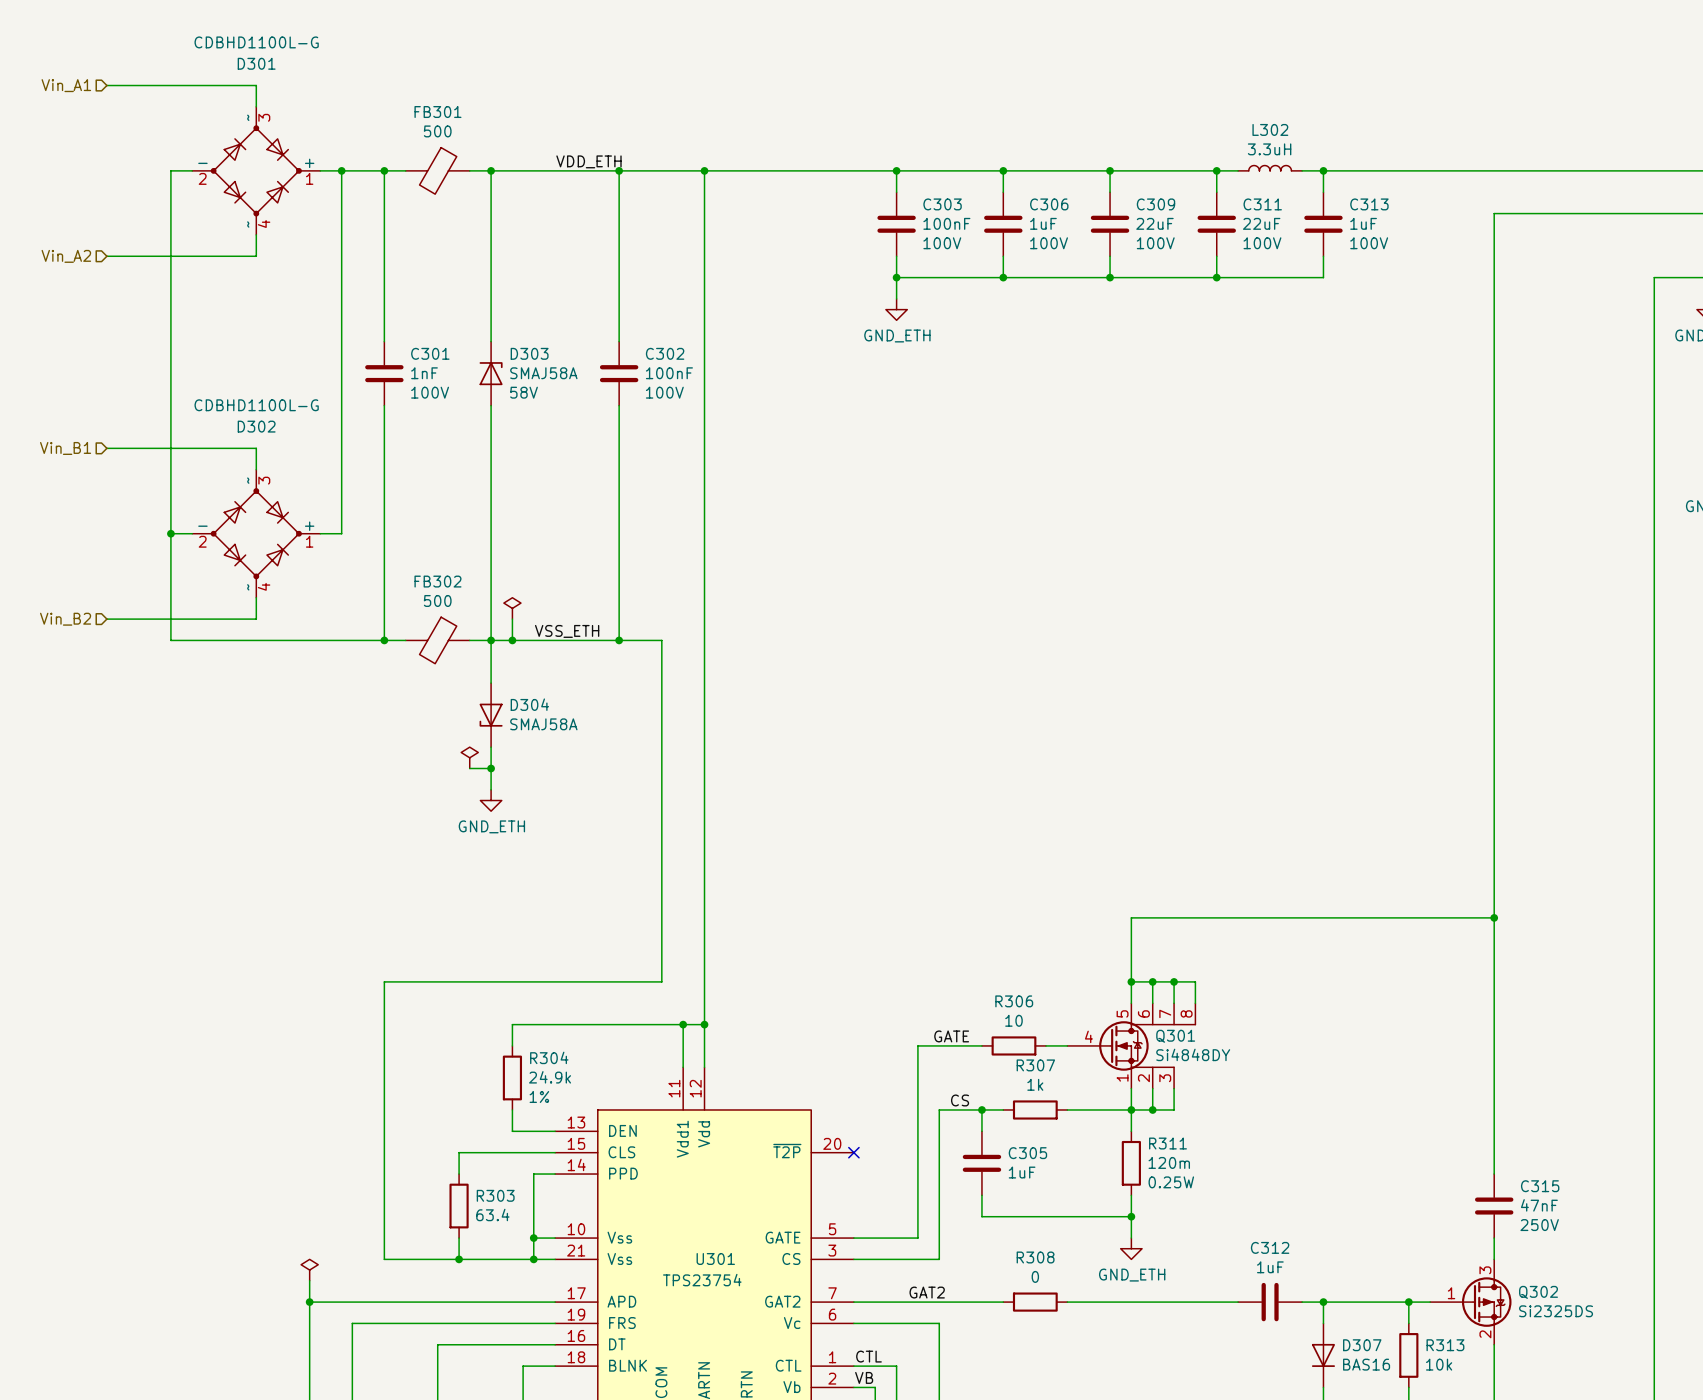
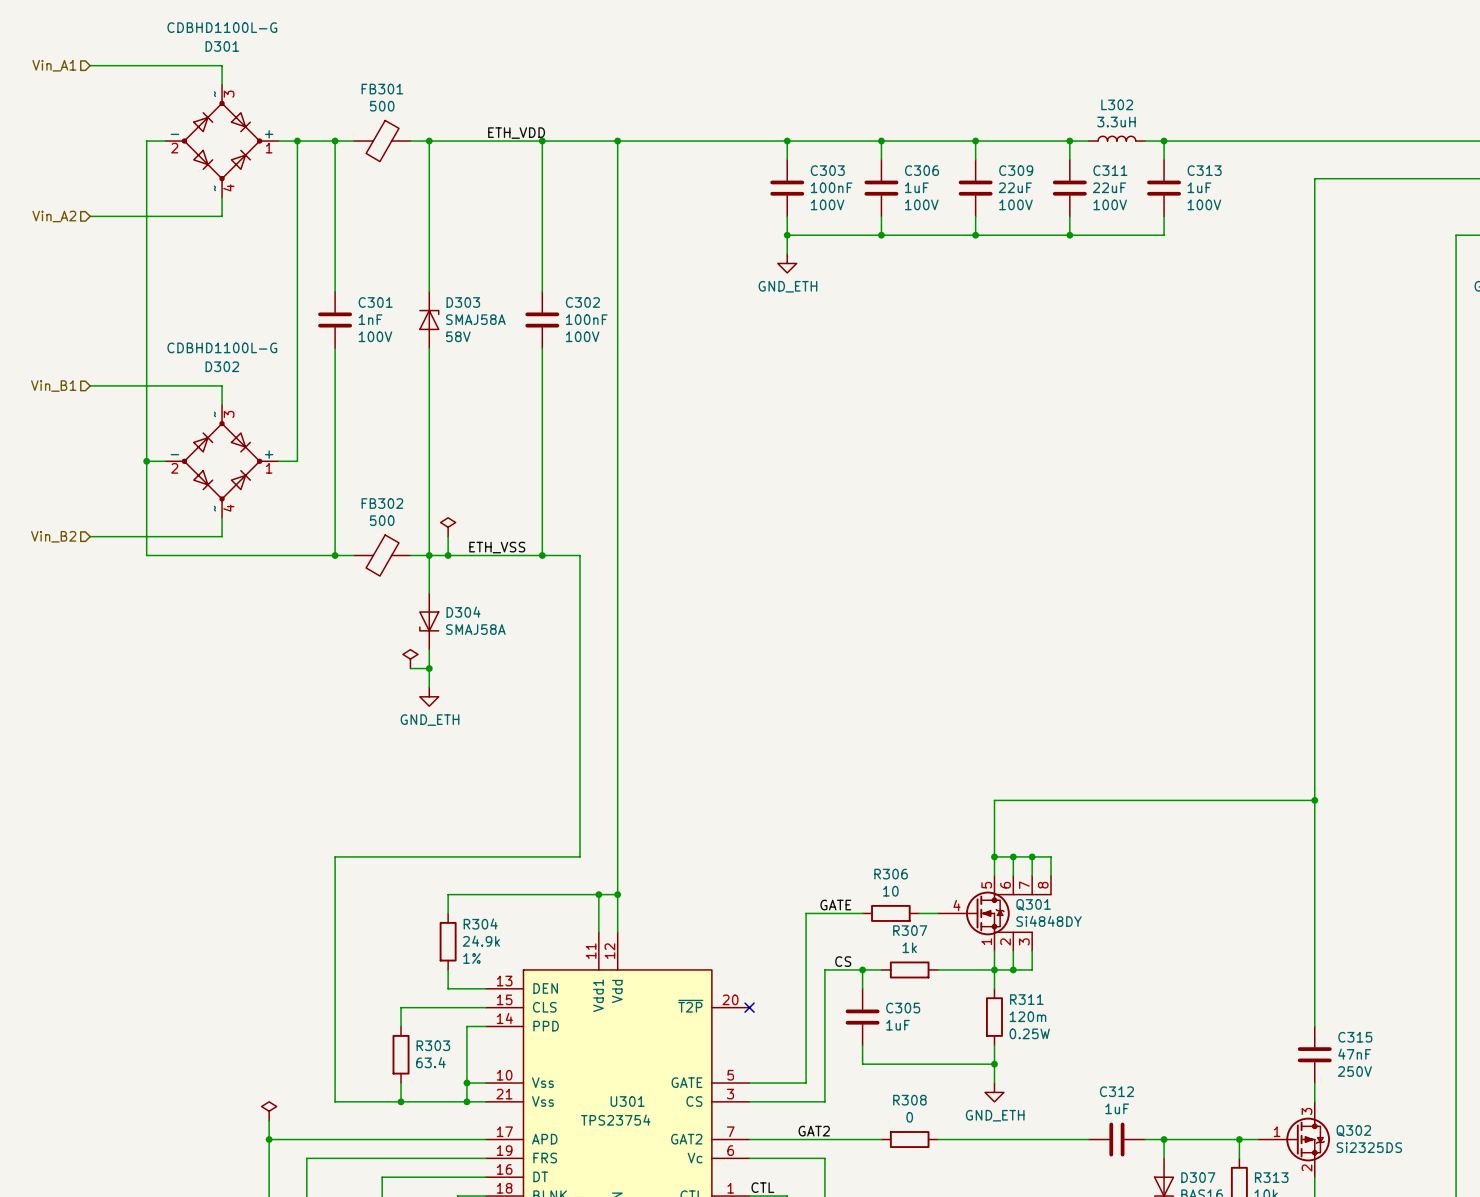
label: VDD_ETH (588, 161) -> ETH_VDD (516, 133)
label: VSS_ETH (567, 631) -> ETH_VSS (497, 547)

